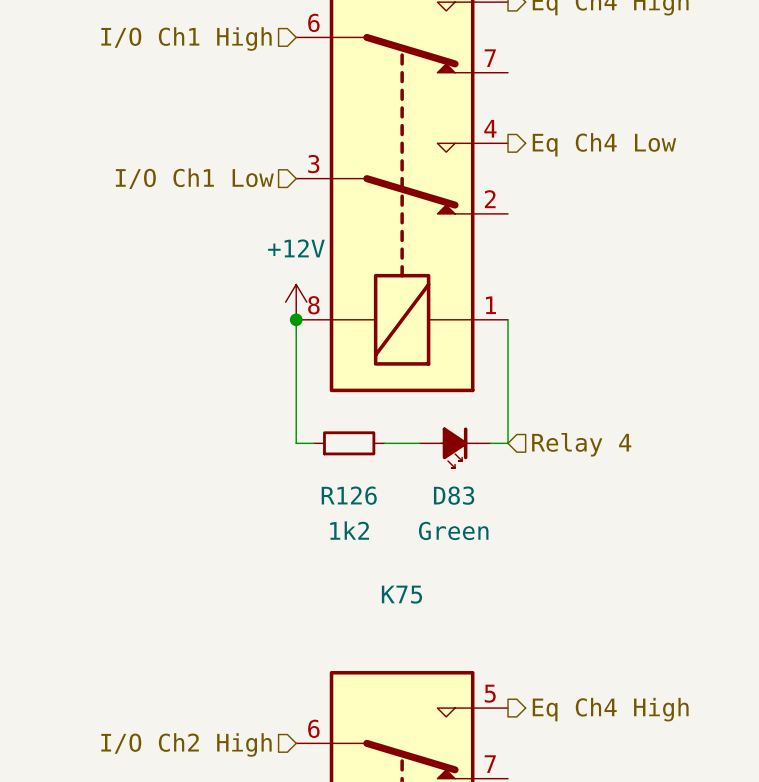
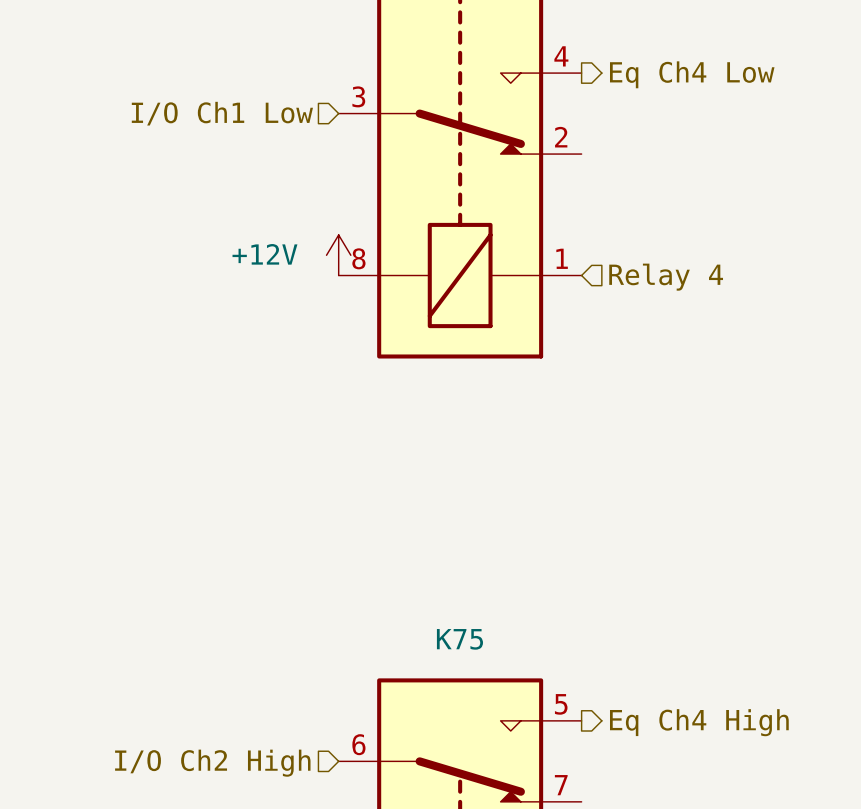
power symbol text position: +12V (296, 248) -> +12V (264, 254)
wire: (296, 319) (296, 443) (313, 443) -> none
junction: (296, 319) -> none
wire: (508, 319) (508, 443) (490, 443) -> none
R126: 1k2 (349, 443) -> none
wire: (384, 443) (419, 443) -> none
hierarchical label position: Relay 4 (581, 444) -> Relay 4 (666, 277)
D83: Green (455, 447) -> none
K75 name position: K75 (401, 594) -> K75 (459, 639)

